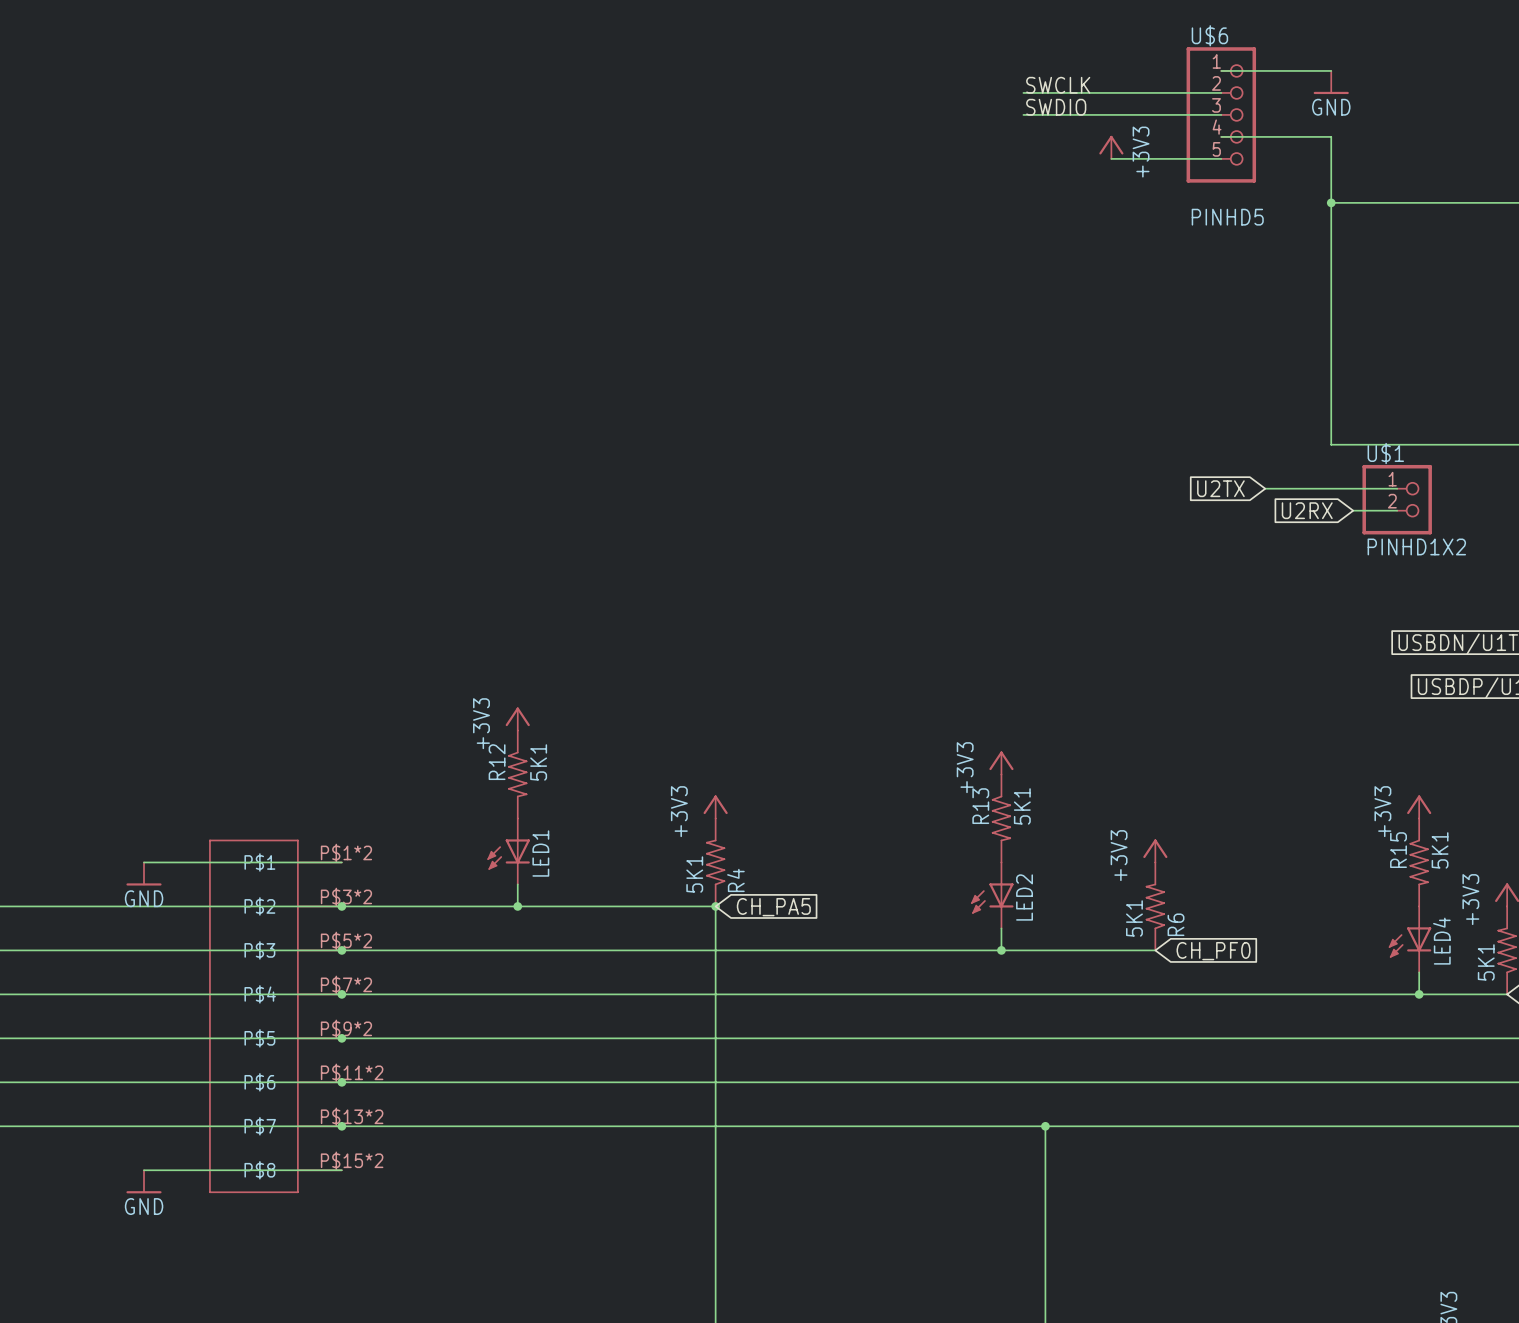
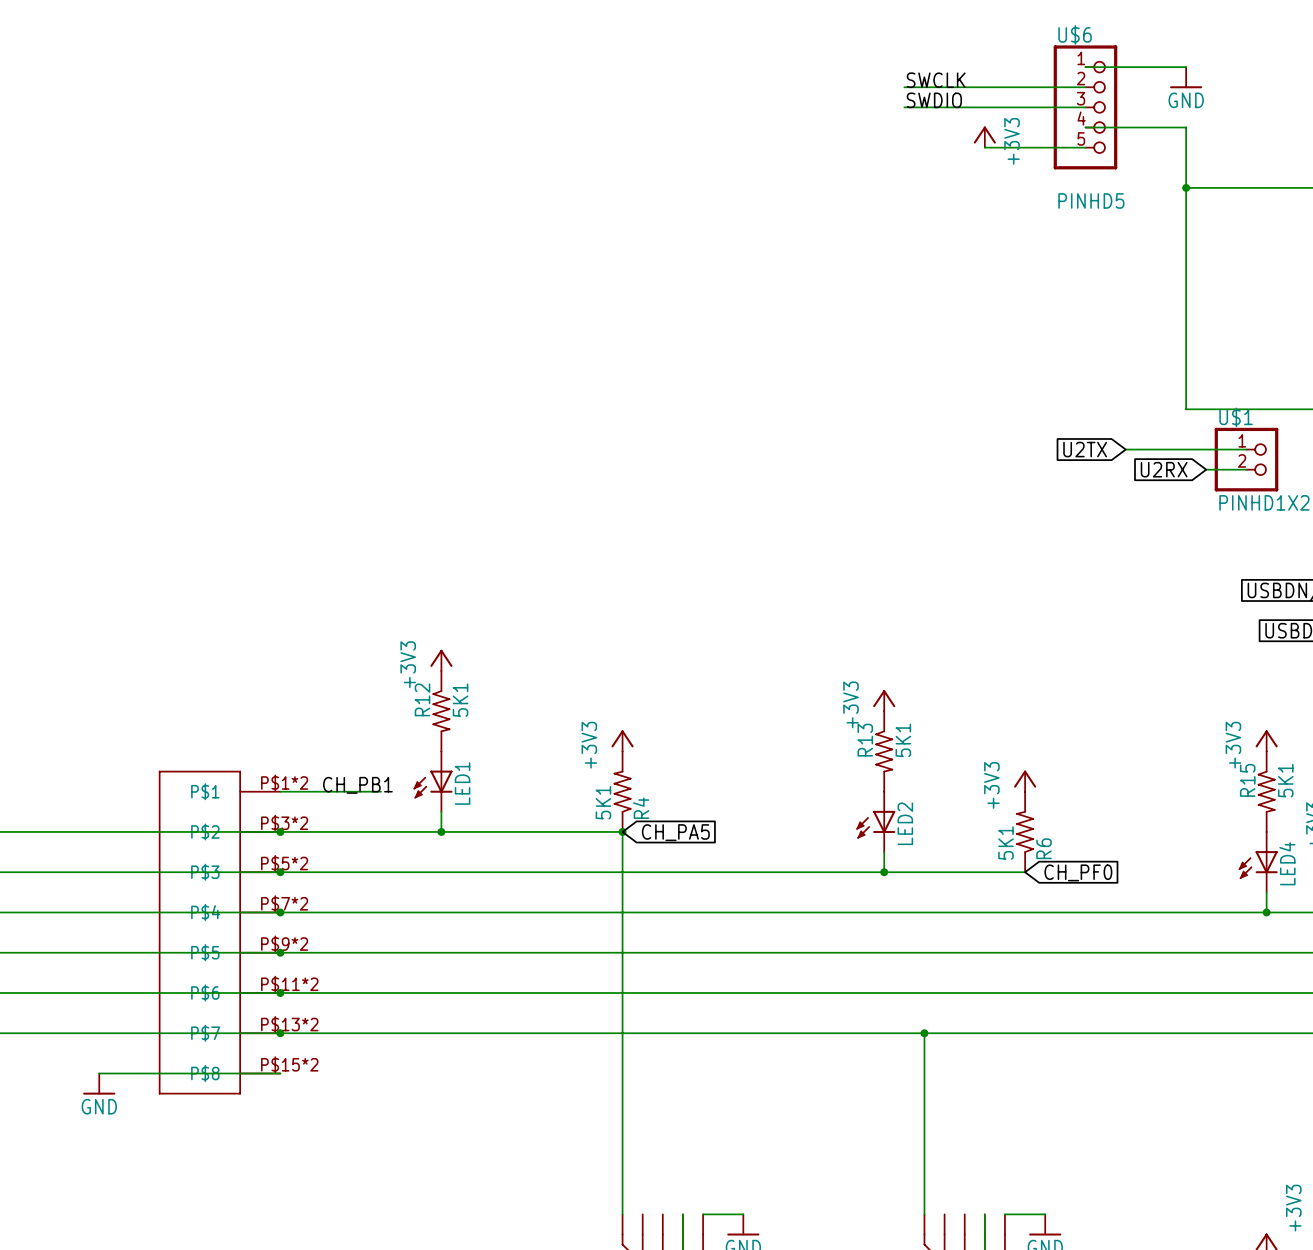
label: none -> CH_PB1 (357, 785)
wire: (143, 862) (341, 862) -> (381, 791) (280, 791)
power symbol: GND (143, 874) -> none

